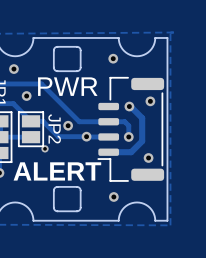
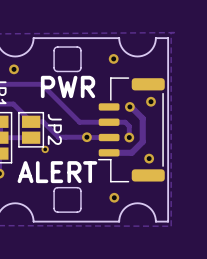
via: (26, 96) -> none
via: (68, 125) -> none

